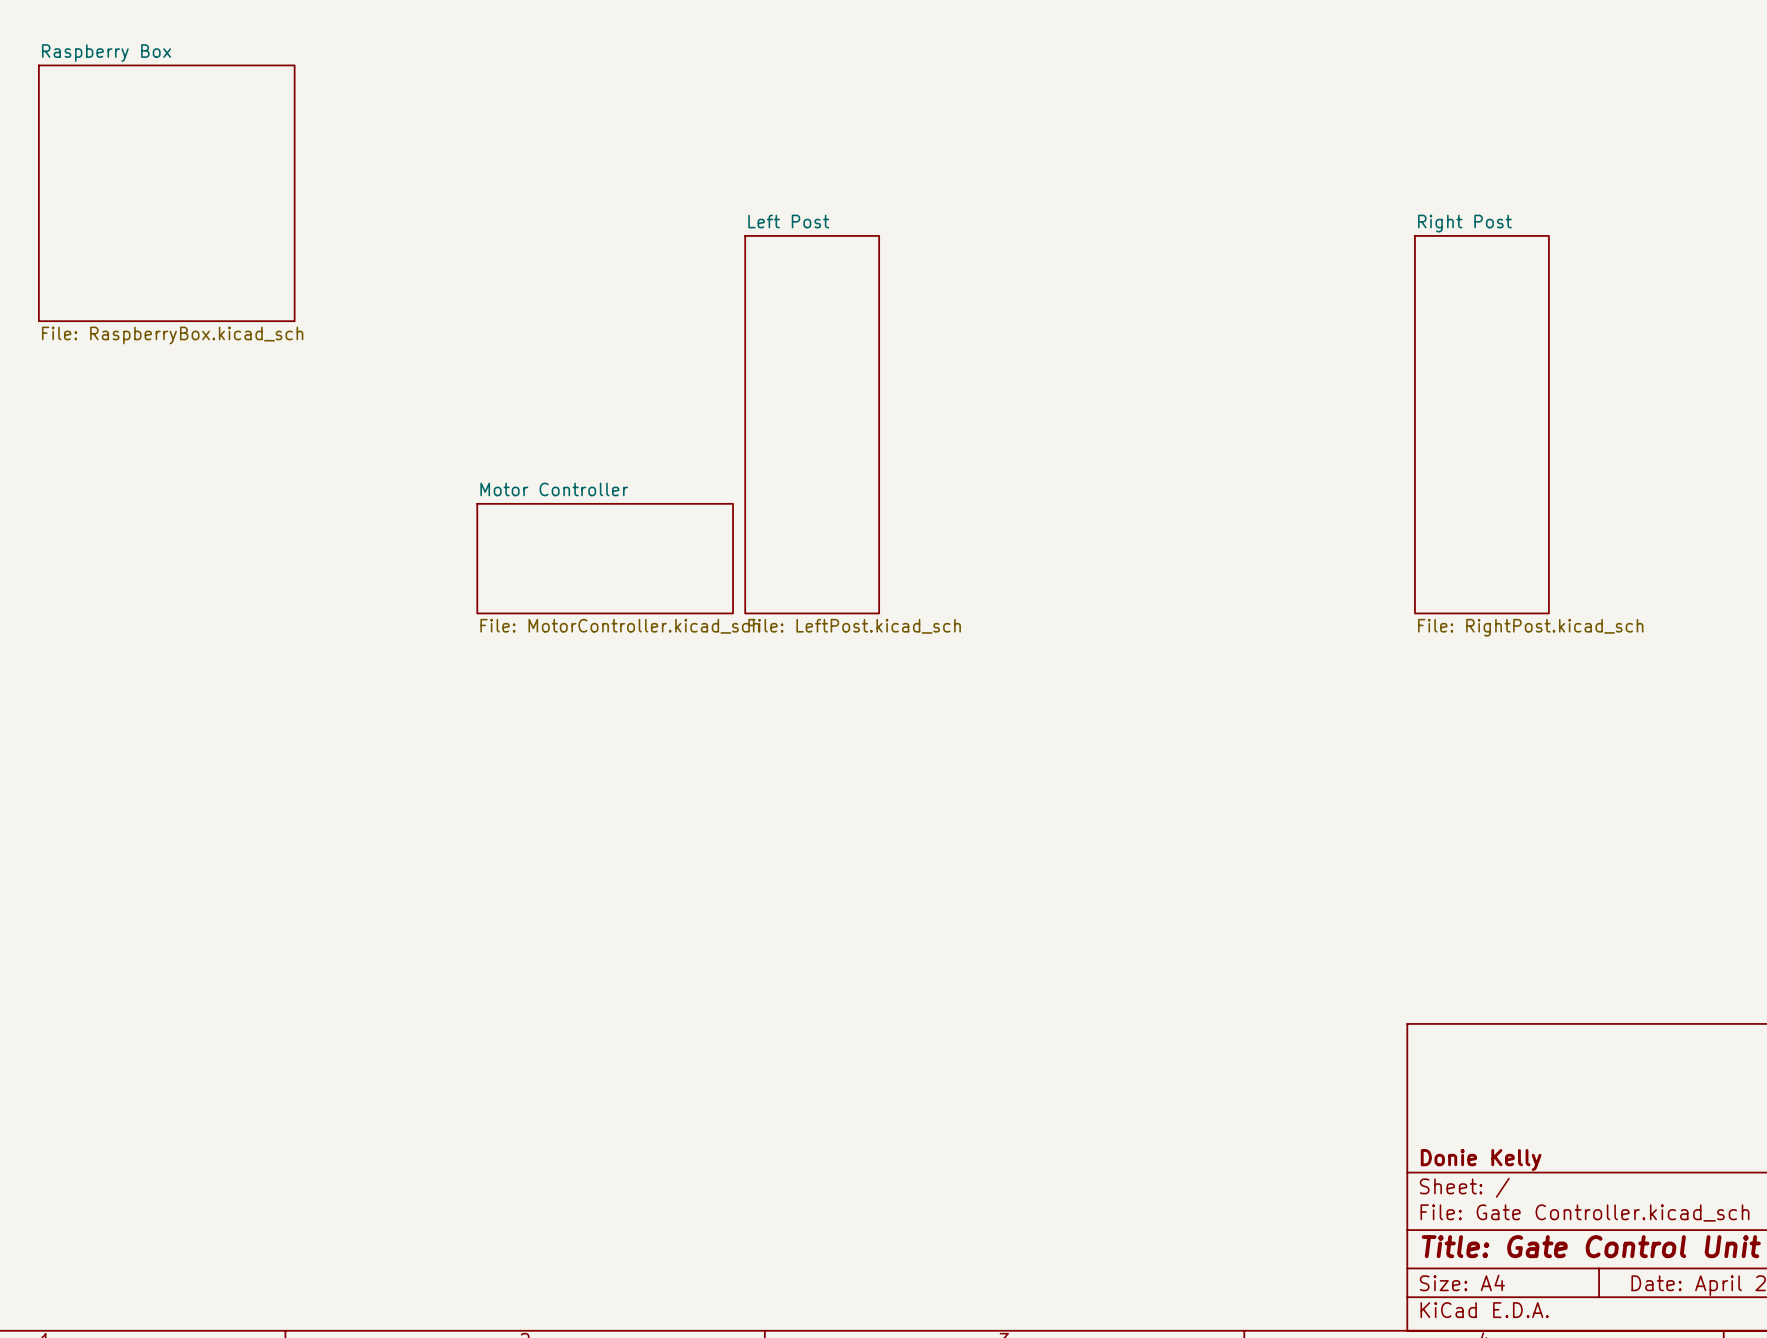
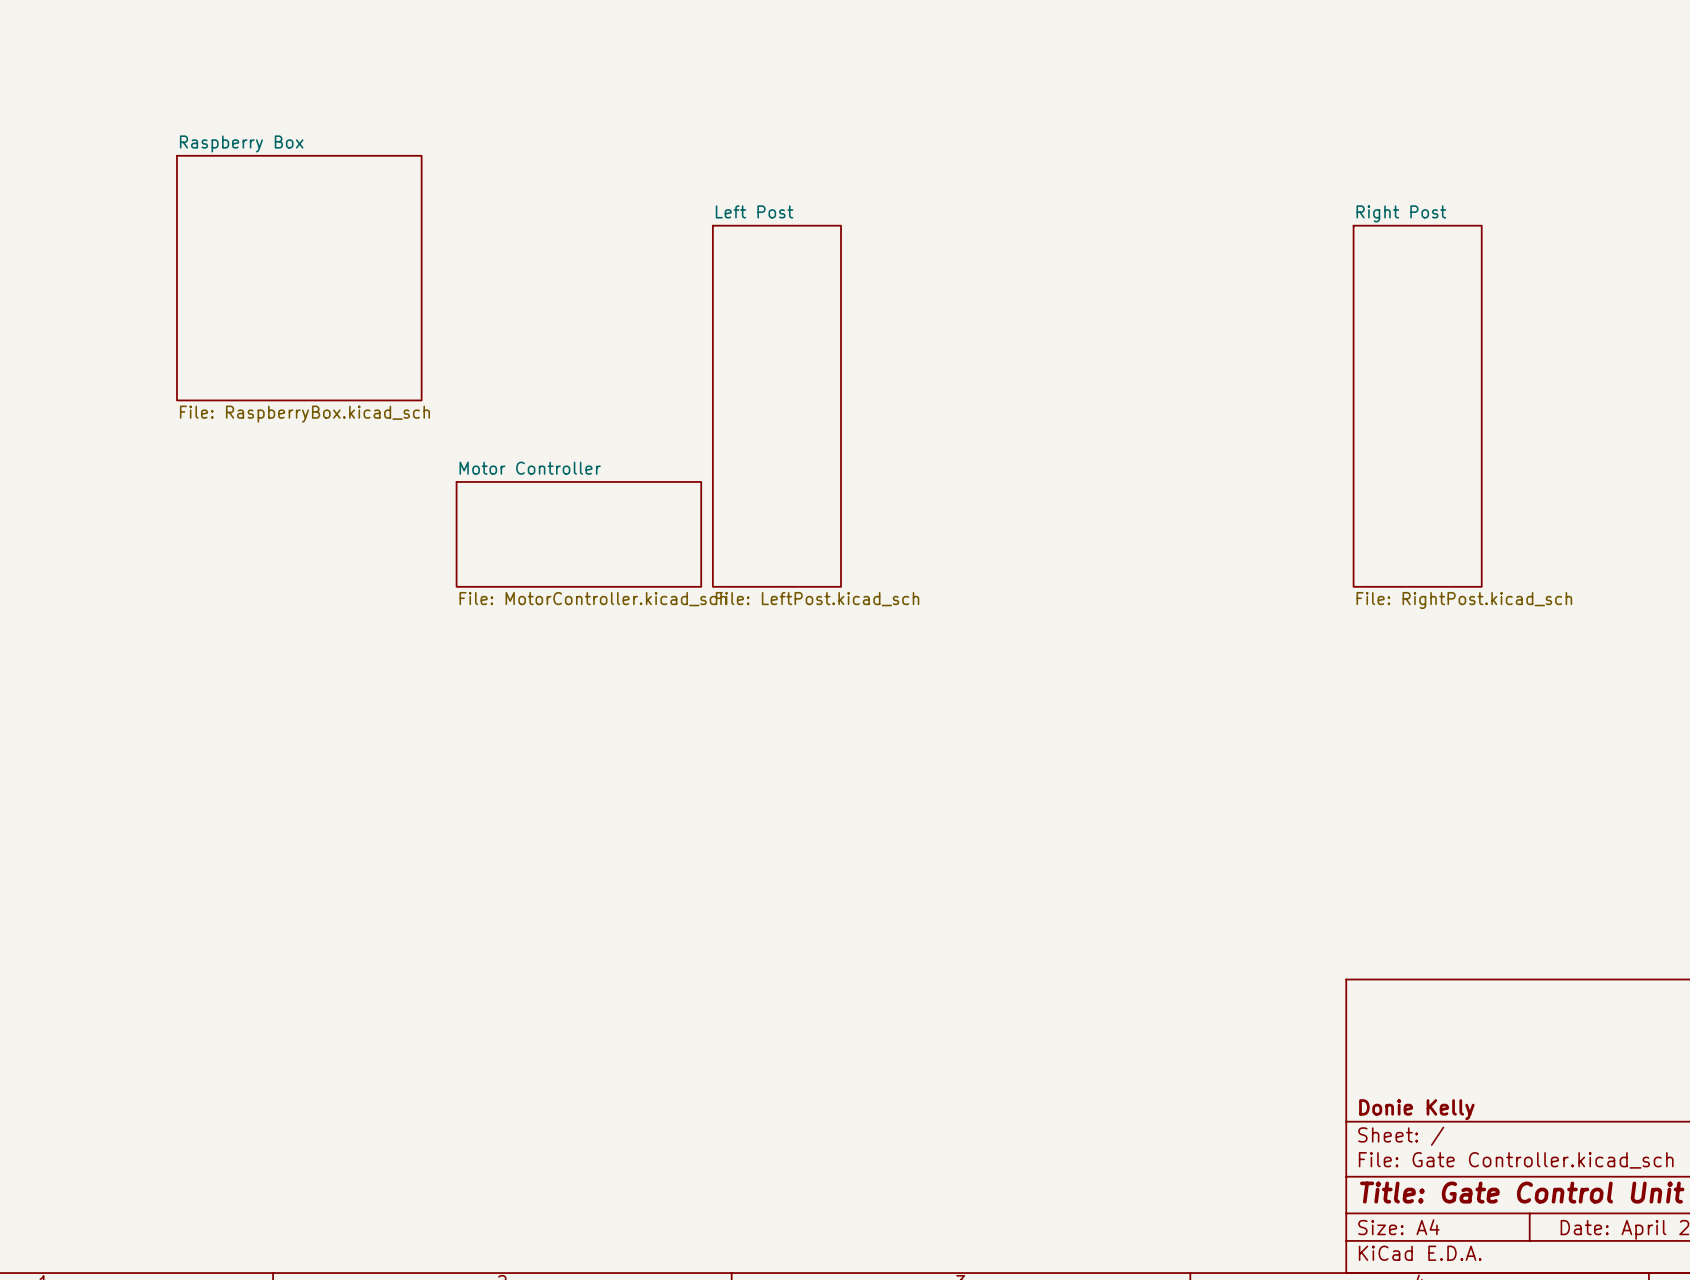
sheet Raspberry Box position: (166, 193) -> (299, 278)

